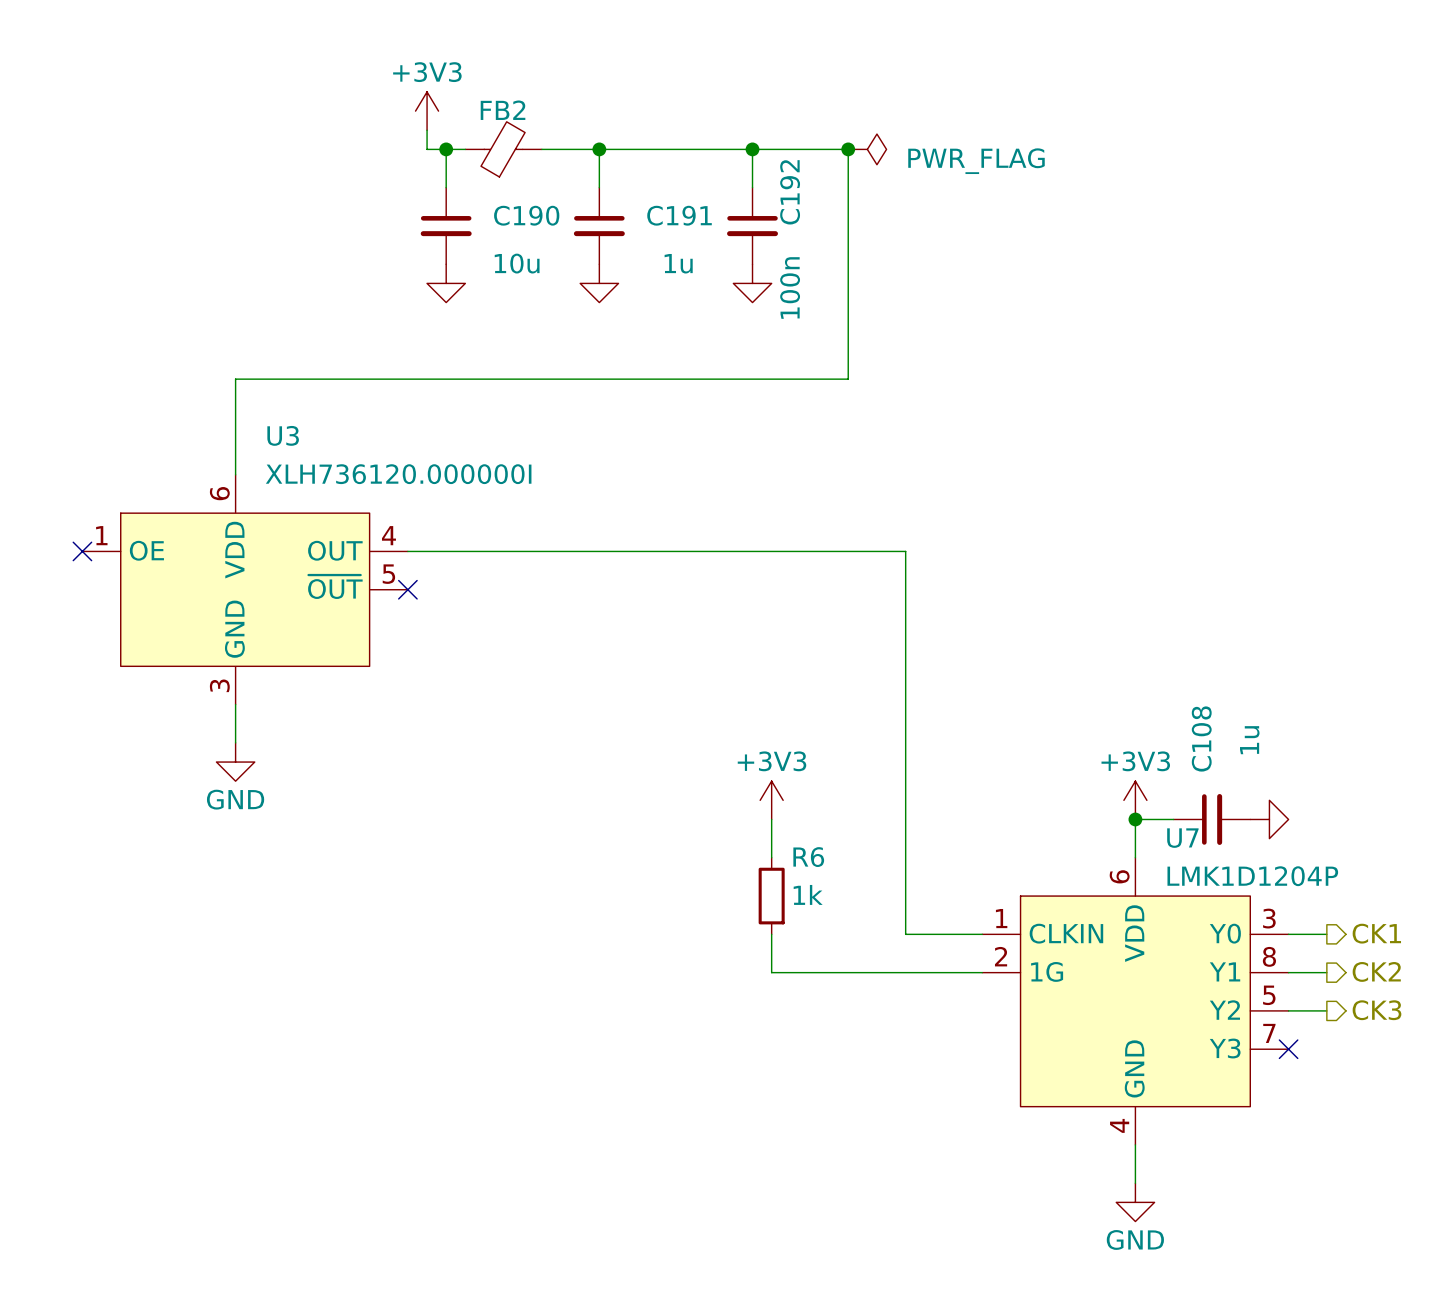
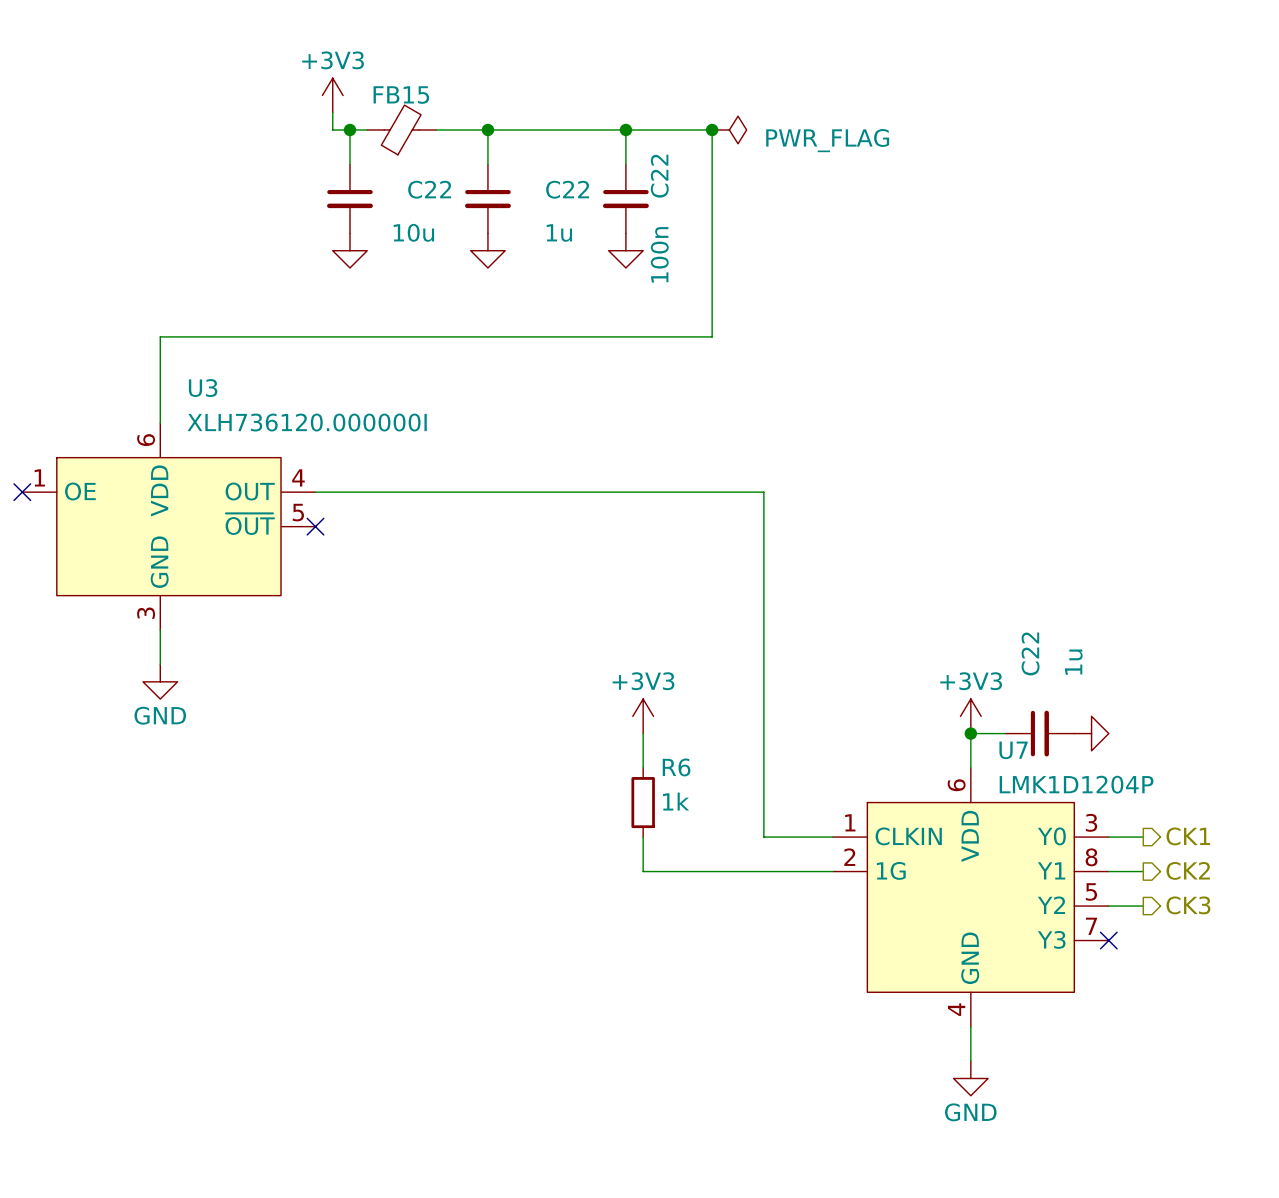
FB2 name: FB2 (503, 110) -> FB15 (401, 95)
C192 name: C192 (790, 192) -> C22 (659, 176)
C190 name: C190 (526, 215) -> C22 (429, 189)
C191 name: C191 (679, 215) -> C22 (567, 189)
C108 name: C108 (1201, 739) -> C22 (1030, 653)

